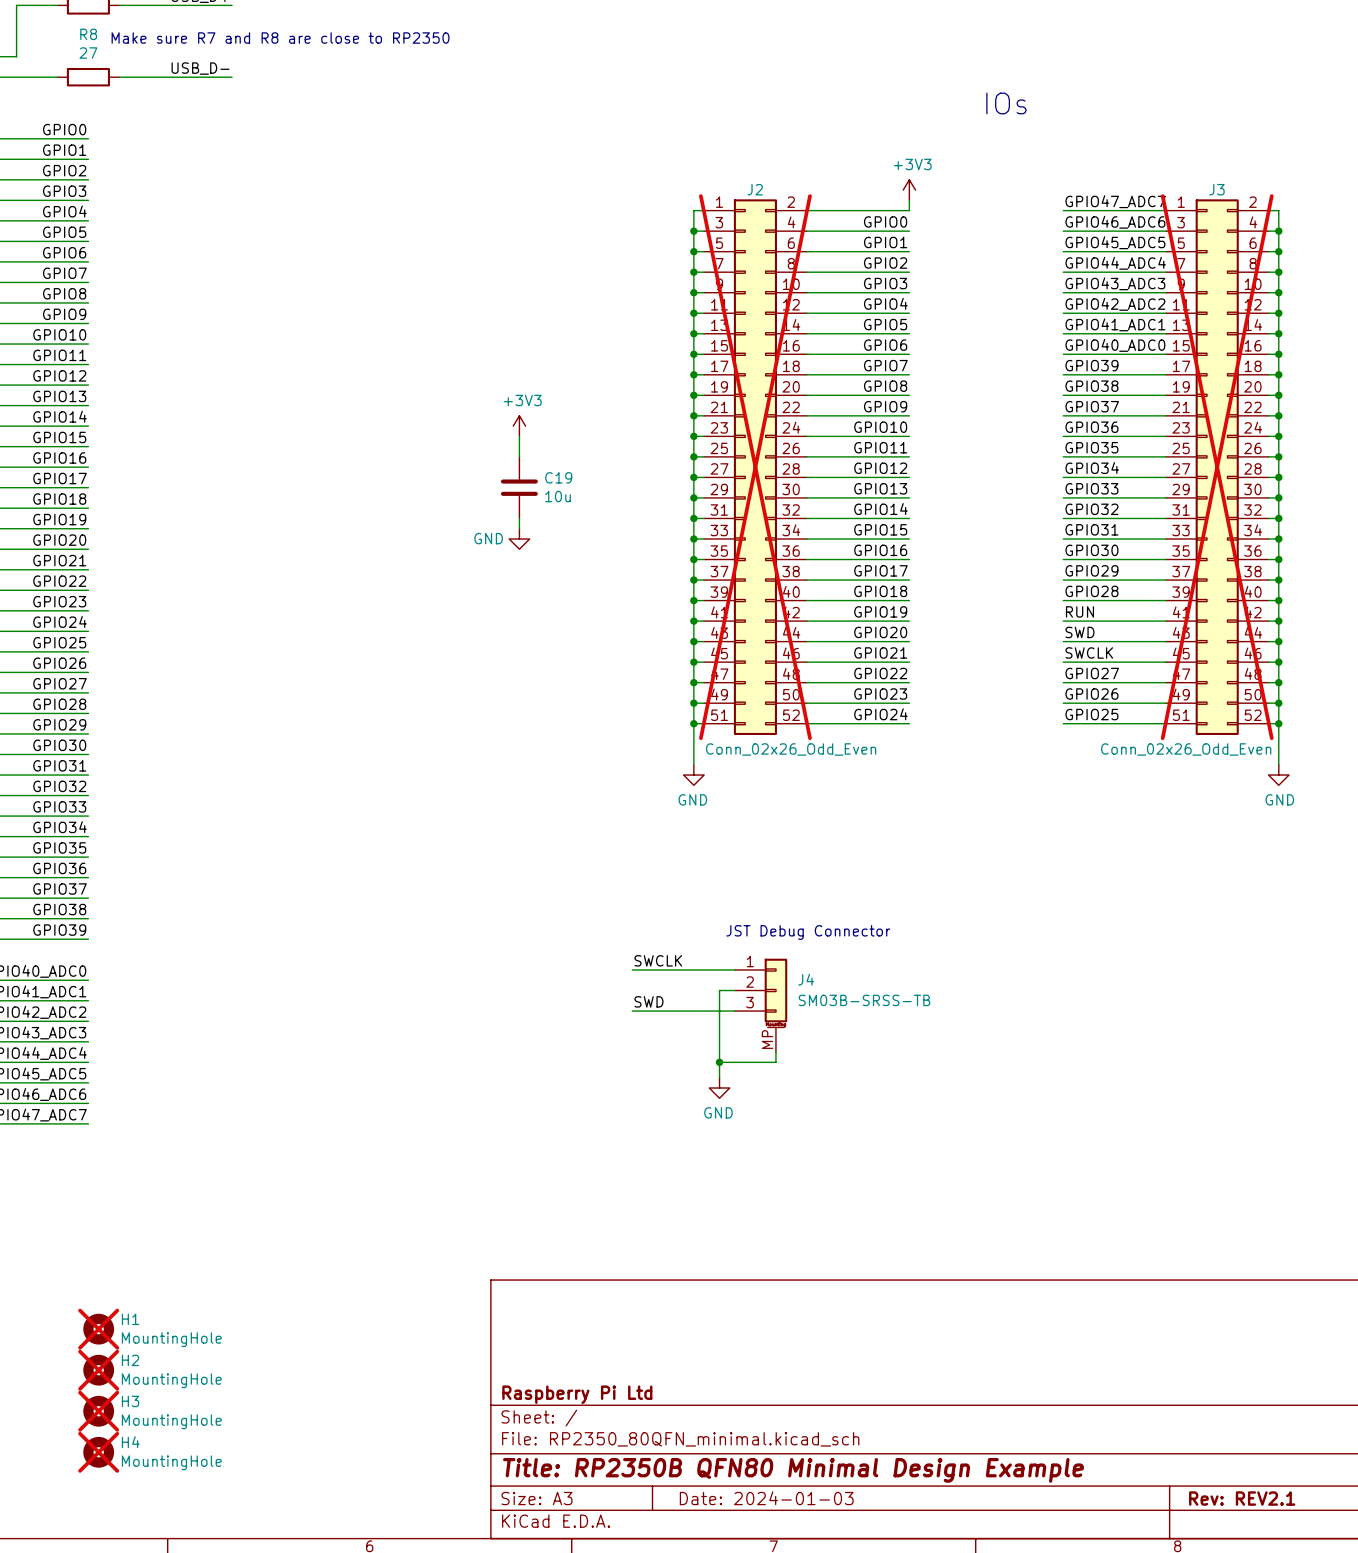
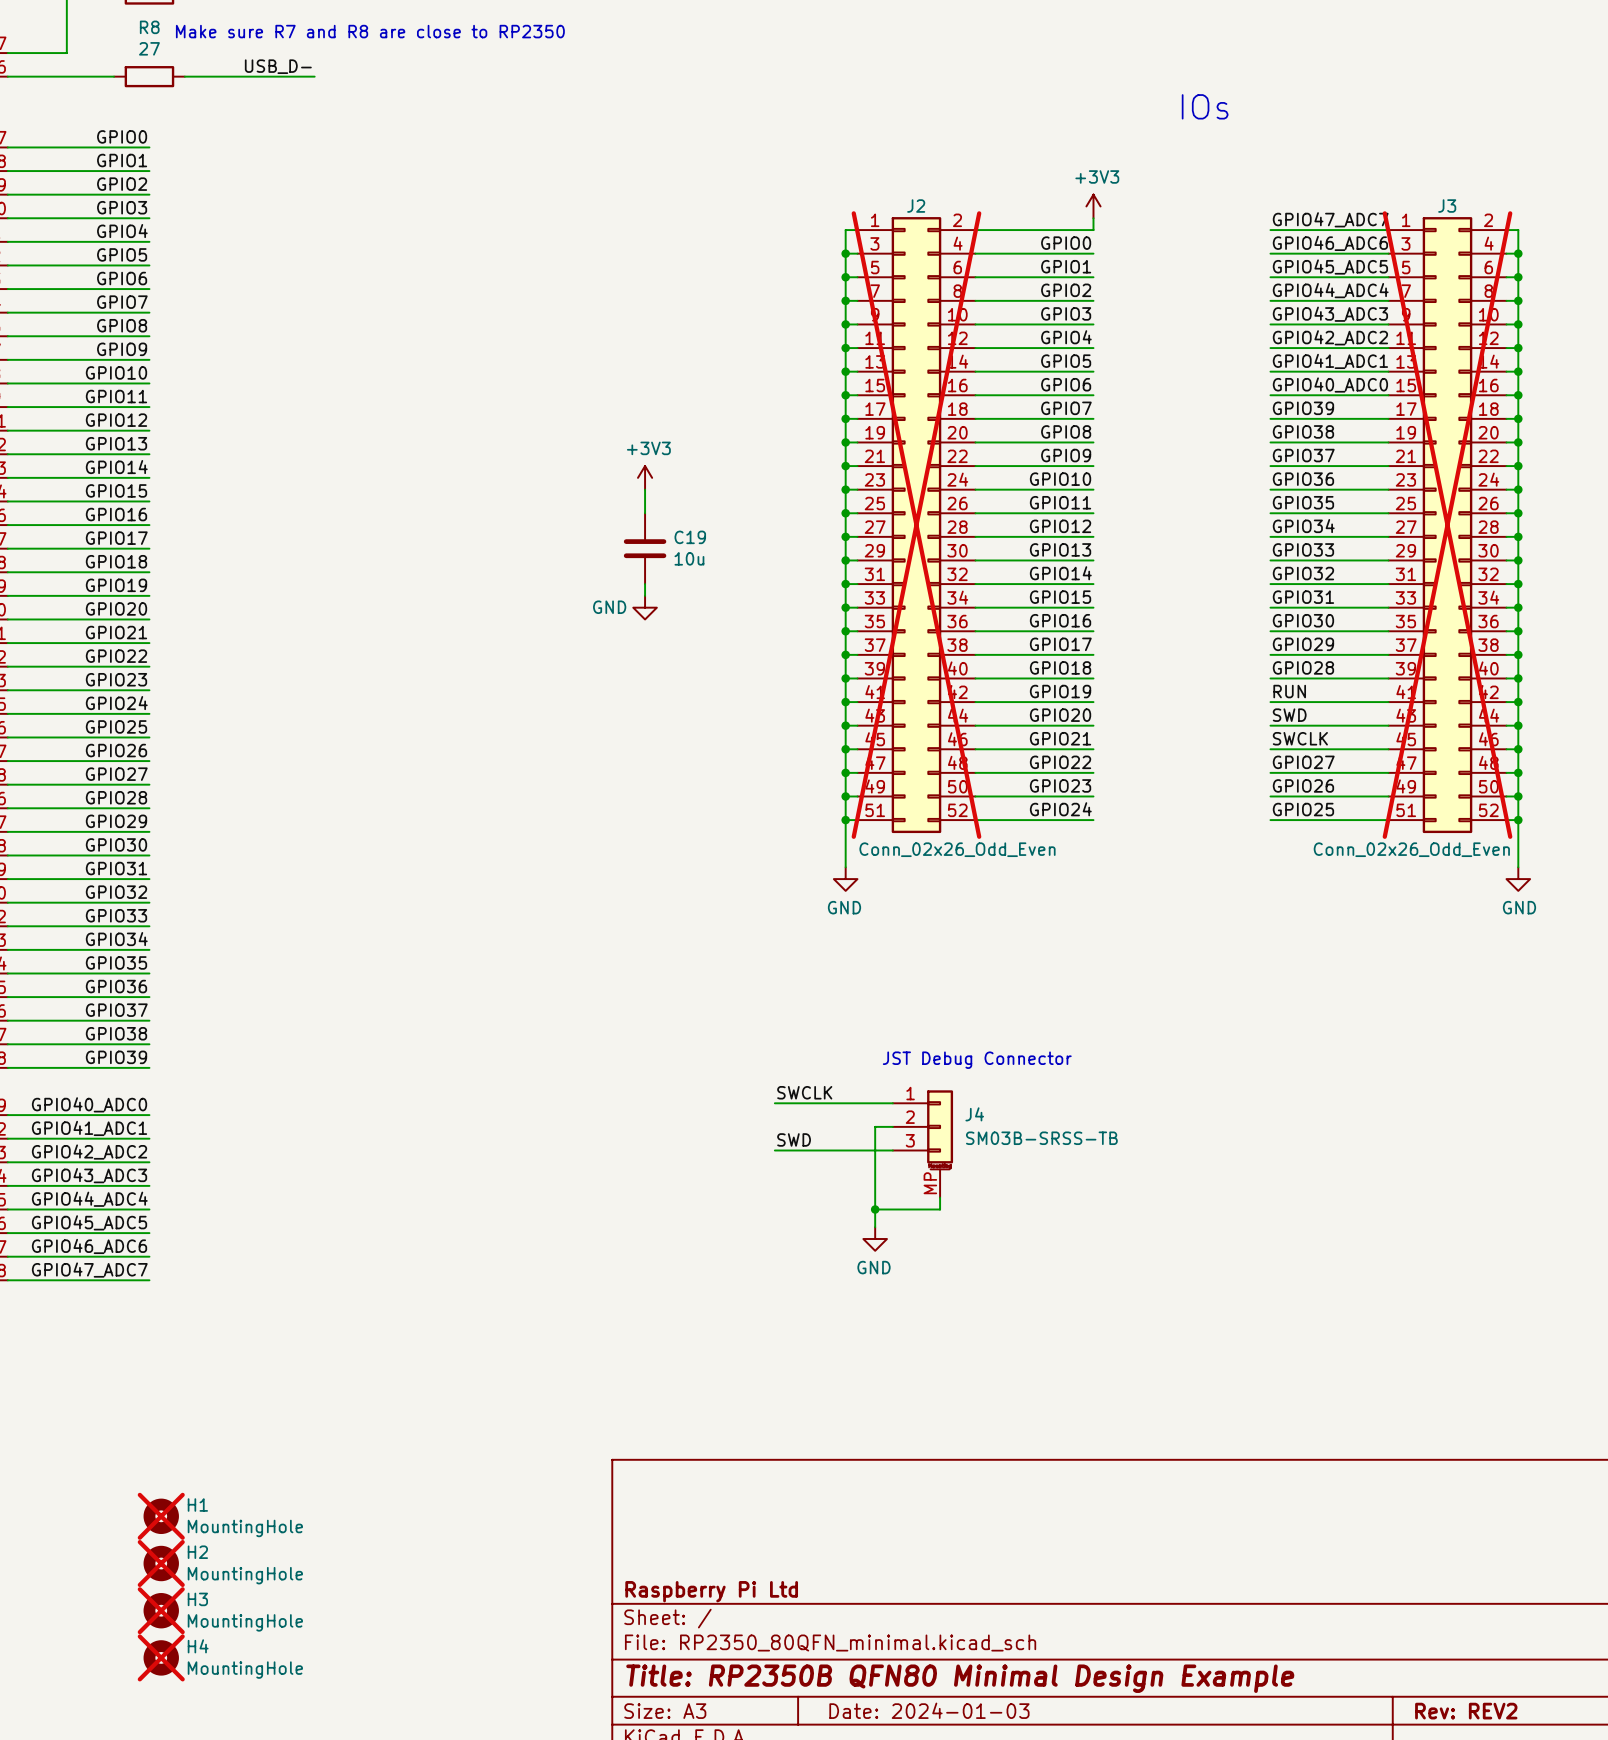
title block: Rev: REV2.1 (1242, 1498) -> Rev: REV2 (1466, 1711)

